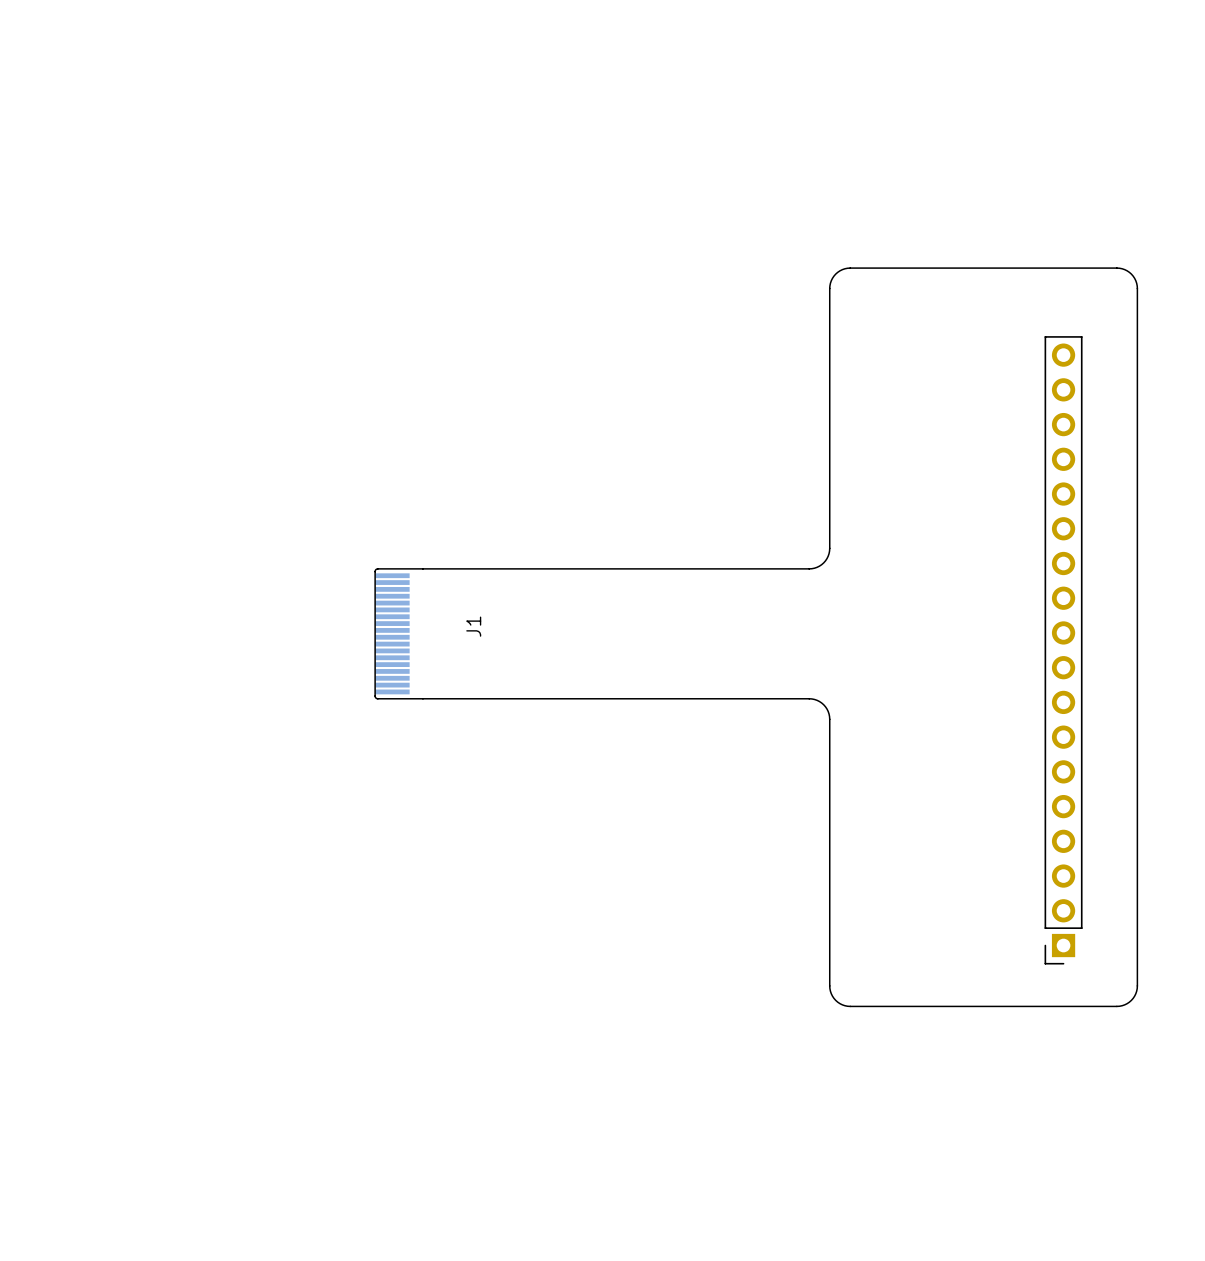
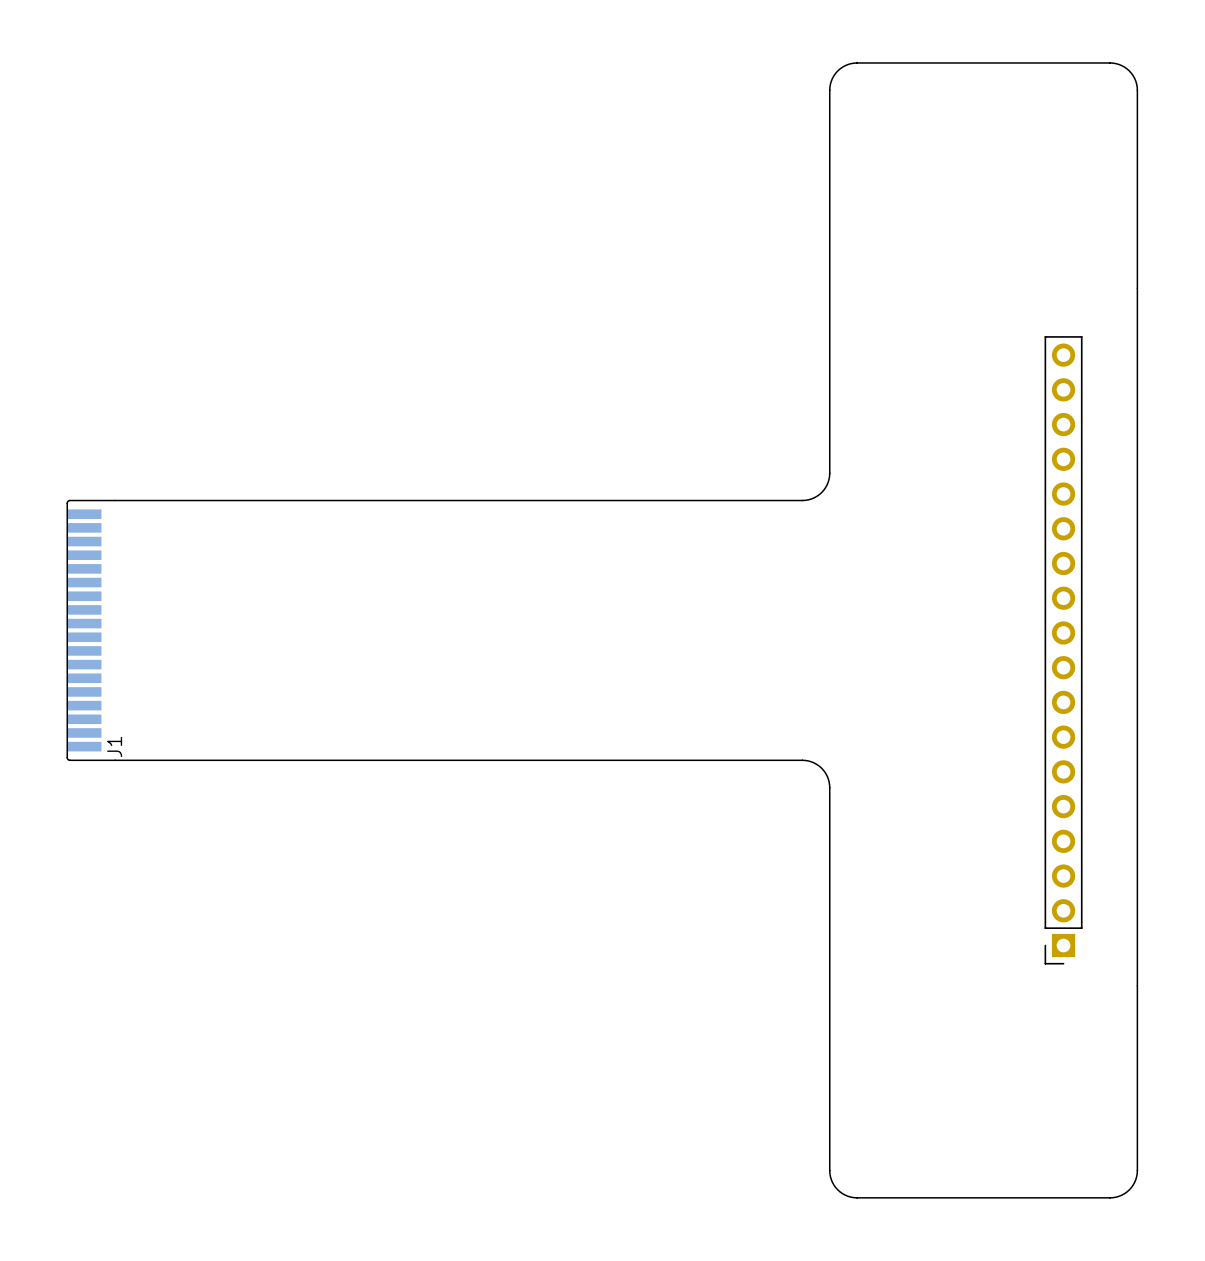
board edge: (1137, 288) (1135, 280) (1131, 274) (1124, 269) (1116, 268) (847, 268) (835, 274) (831, 280) (829, 288) -> (1137, 288) (1137, 87) (1134, 78) (1127, 68) (1119, 64) (1110, 62) (857, 62) (848, 64) (840, 68) (832, 78) (829, 90) (829, 288)
board edge: (829, 473) (829, 551) (823, 562) (814, 568) (422, 568) -> (829, 473) (827, 485) (821, 492) (811, 498) (802, 500) (115, 500)
J1 footprint: [374, 568, 424, 700] -> [66, 500, 116, 761]
J1 name position: J1 (473, 626) -> J1 (114, 746)
board edge: (422, 698) (814, 699) (823, 704) (829, 716) (829, 787) -> (115, 760) (802, 760) (811, 761) (821, 768) (828, 778) (829, 787)
board edge: (1137, 985) (1135, 993) (1131, 1000) (1124, 1004) (1116, 1006) (847, 1006) (835, 1000) (831, 993) (829, 985) -> (1137, 985) (1137, 1173) (1133, 1185) (1127, 1191) (1119, 1196) (1110, 1197) (857, 1197) (848, 1196) (840, 1191) (832, 1182) (829, 1170) (829, 985)

